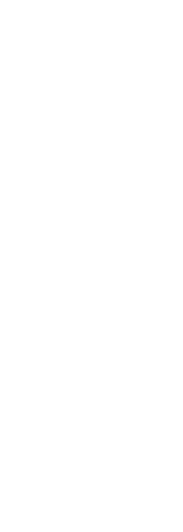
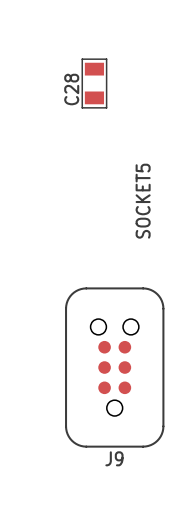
C28: none -> (94, 83)
SOCKET5: none -> (143, 201)
J9: none -> (114, 367)

